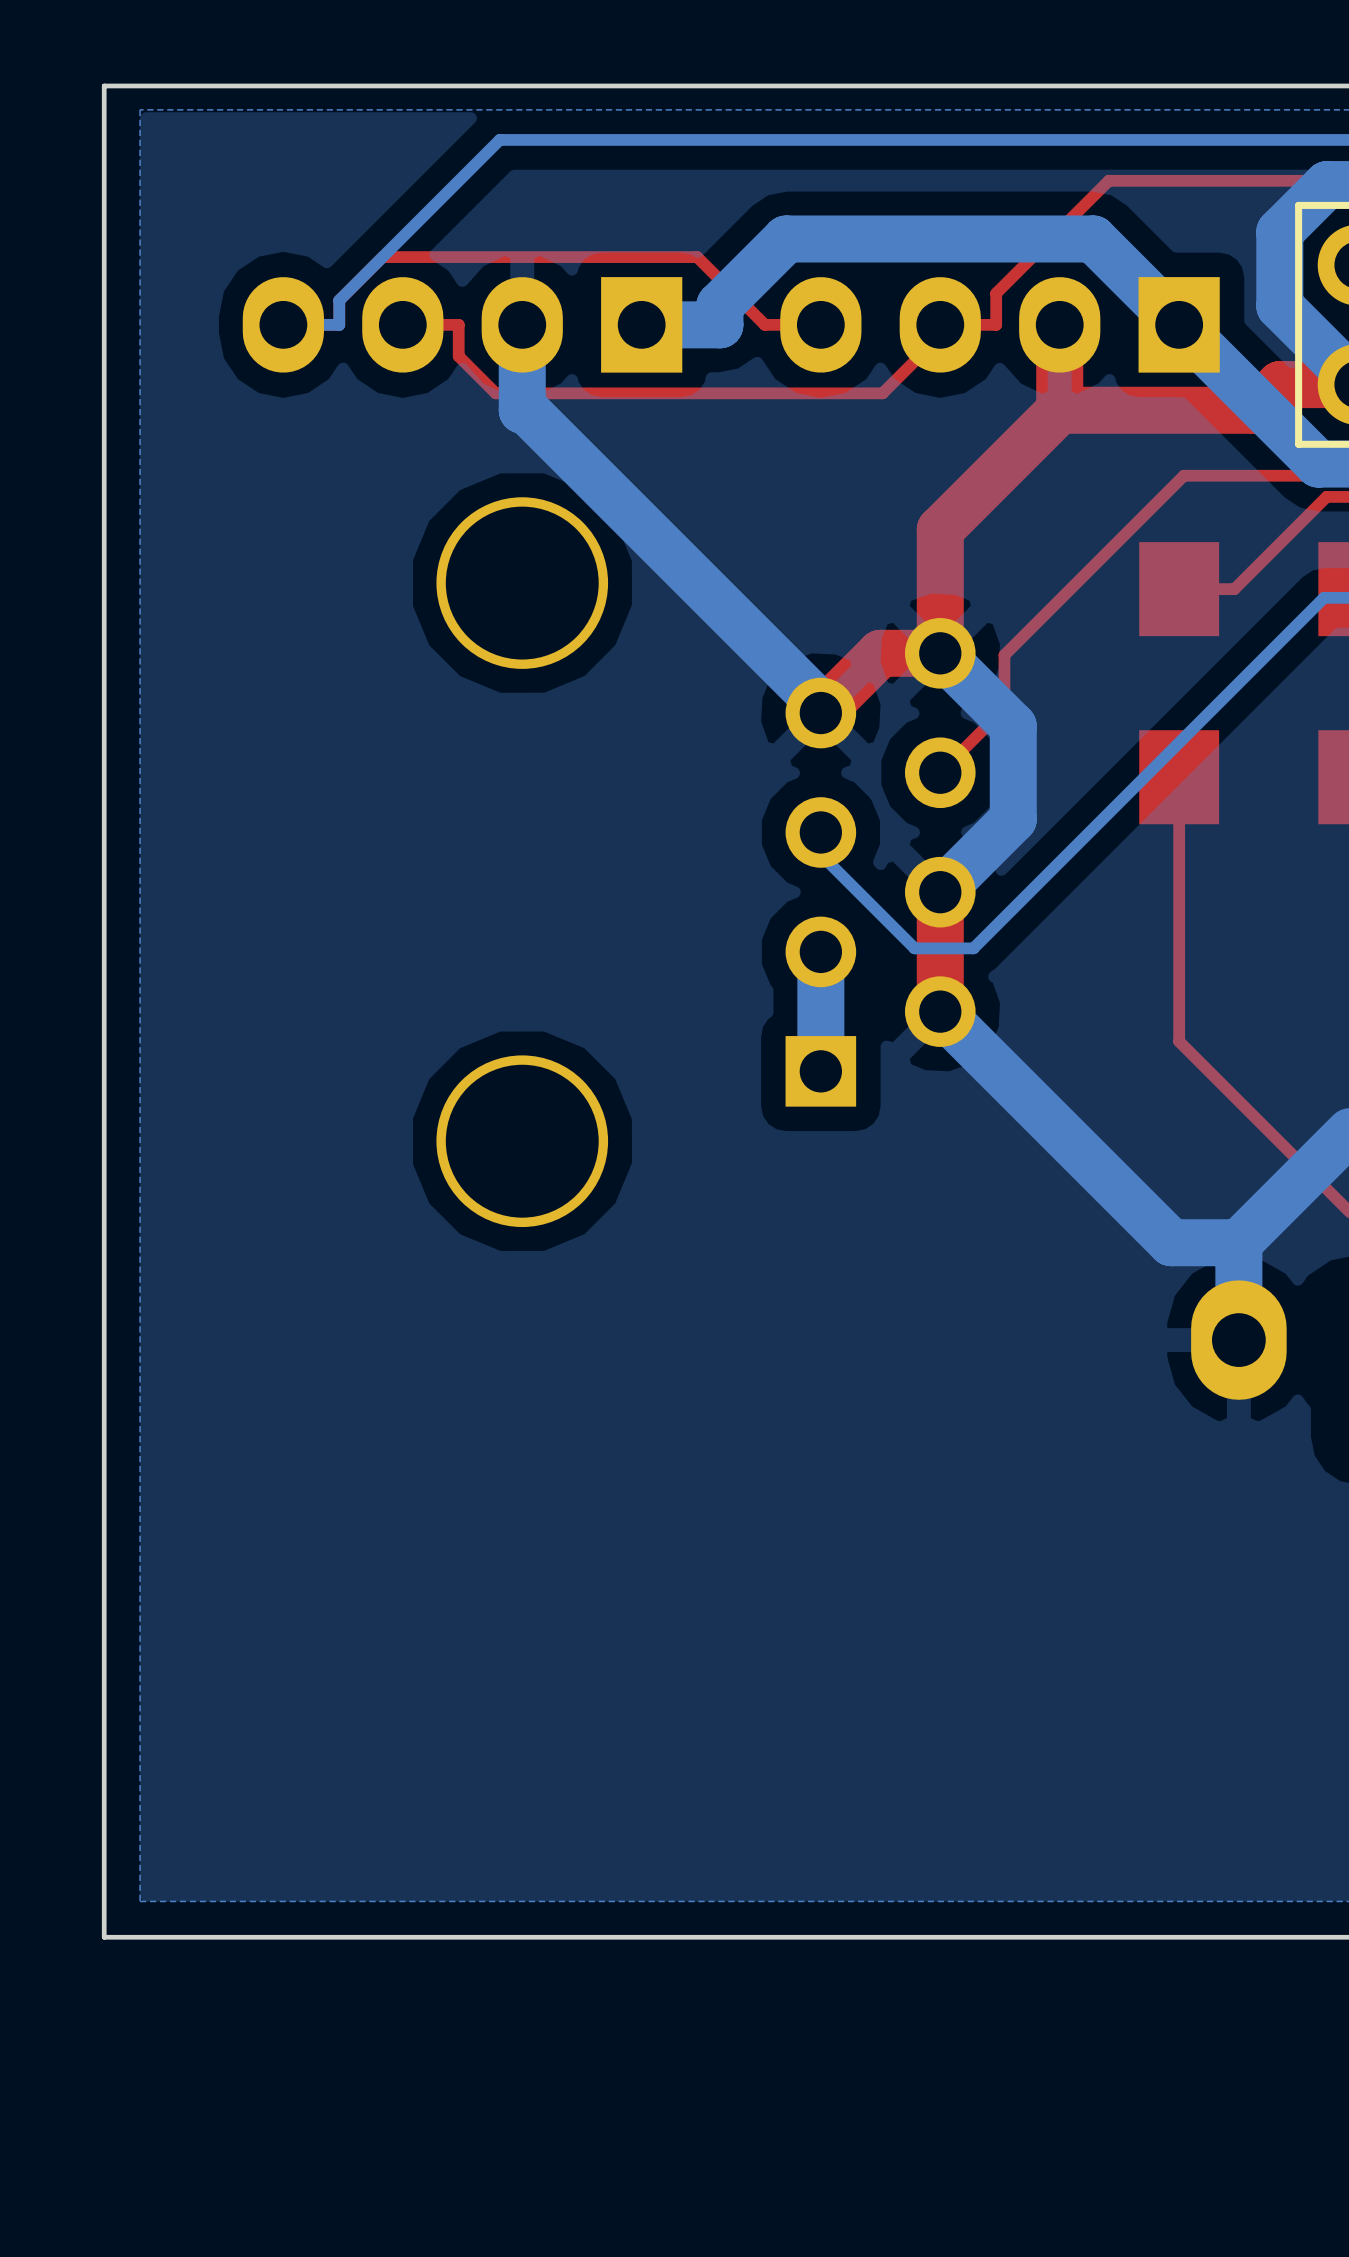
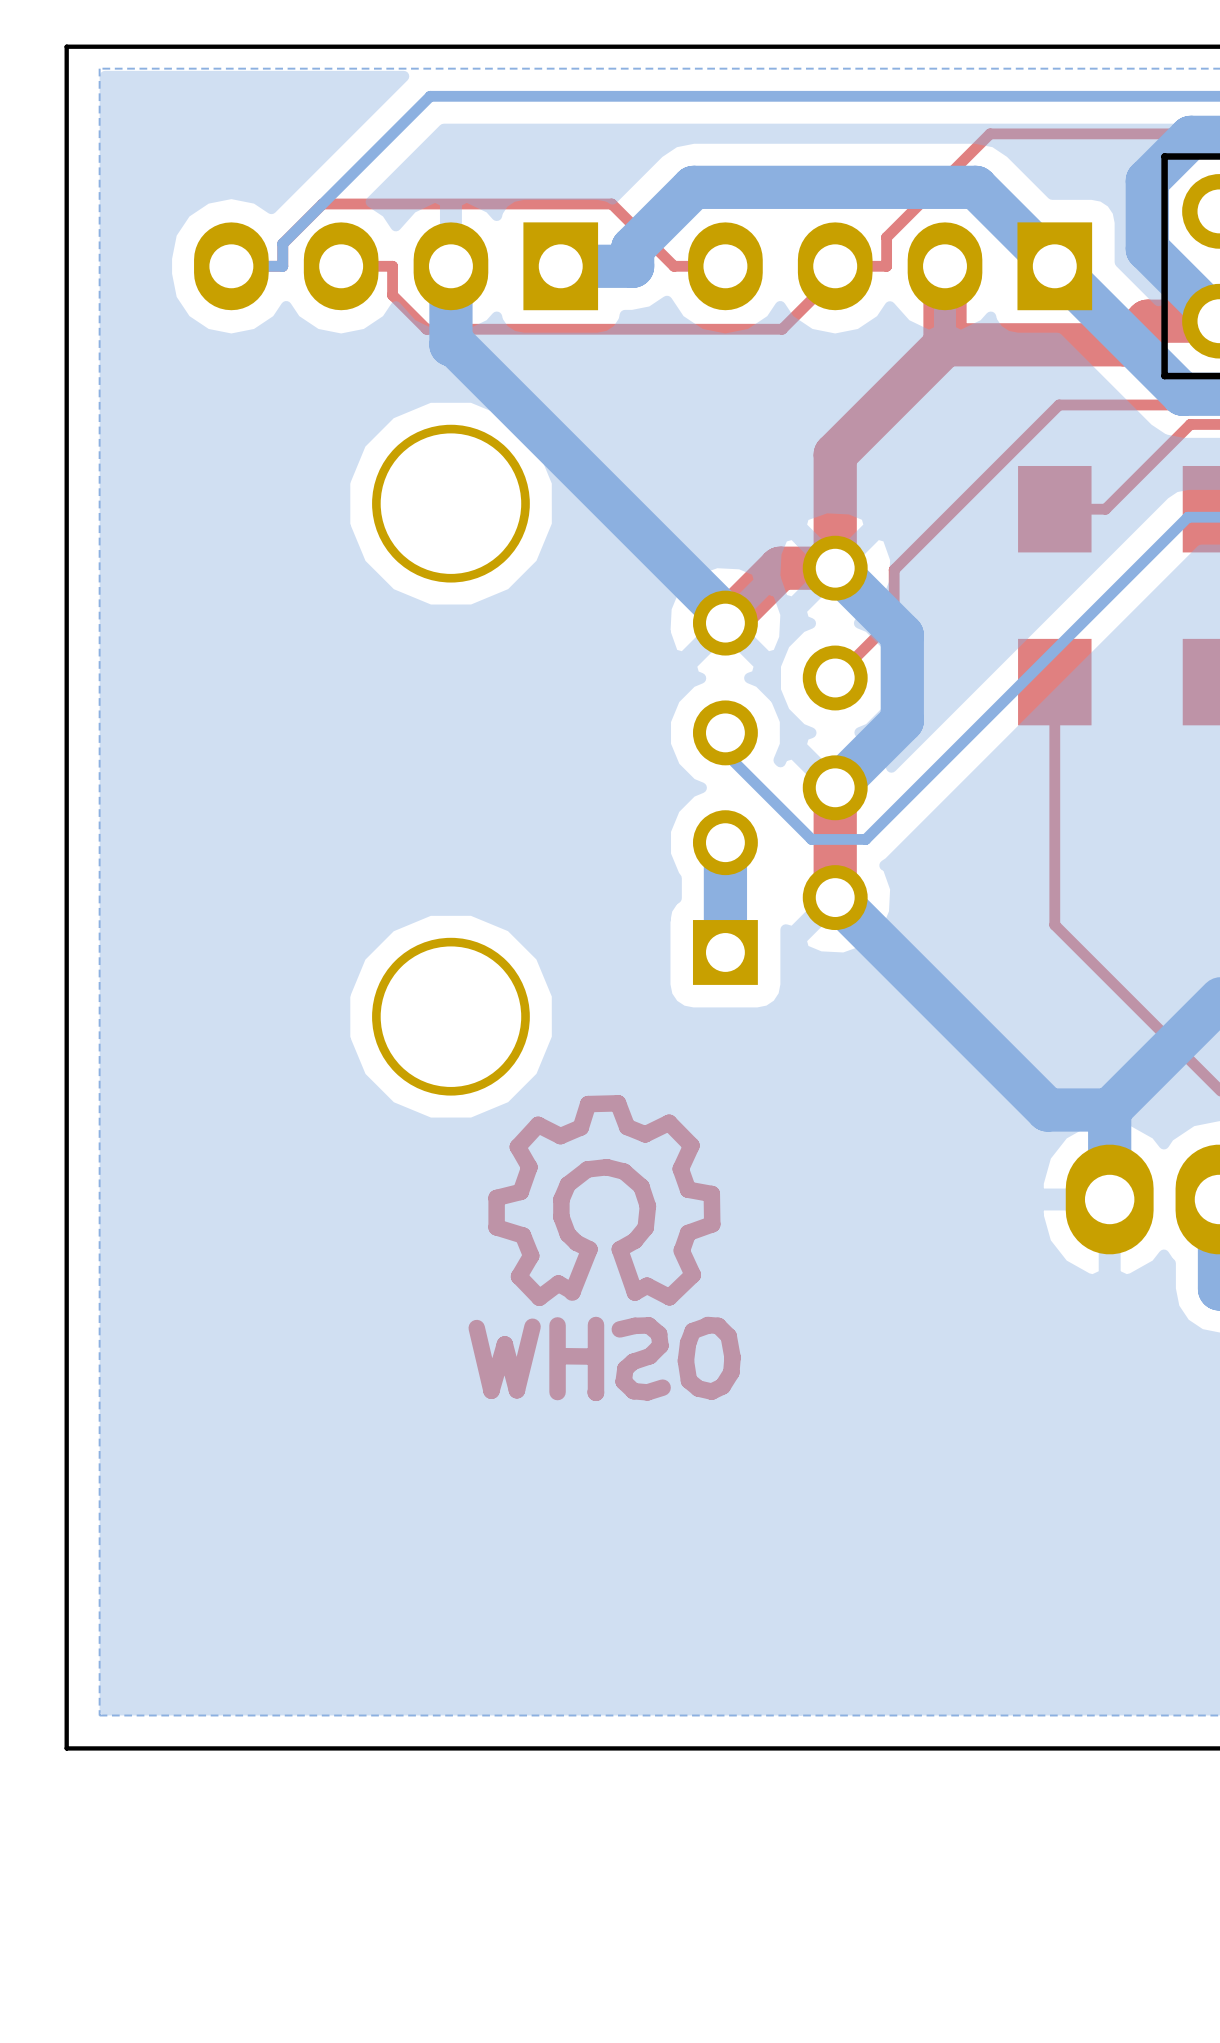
drawing: none -> [468, 1095, 741, 1402]

